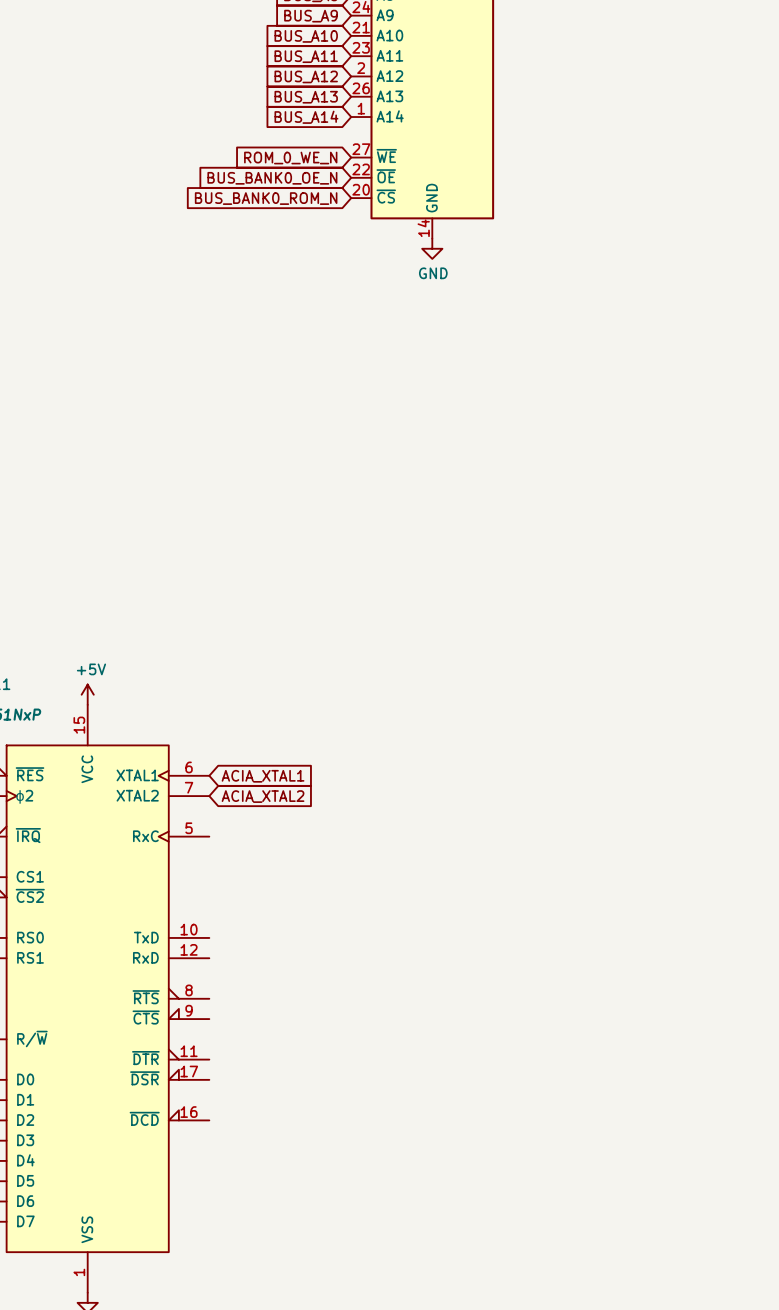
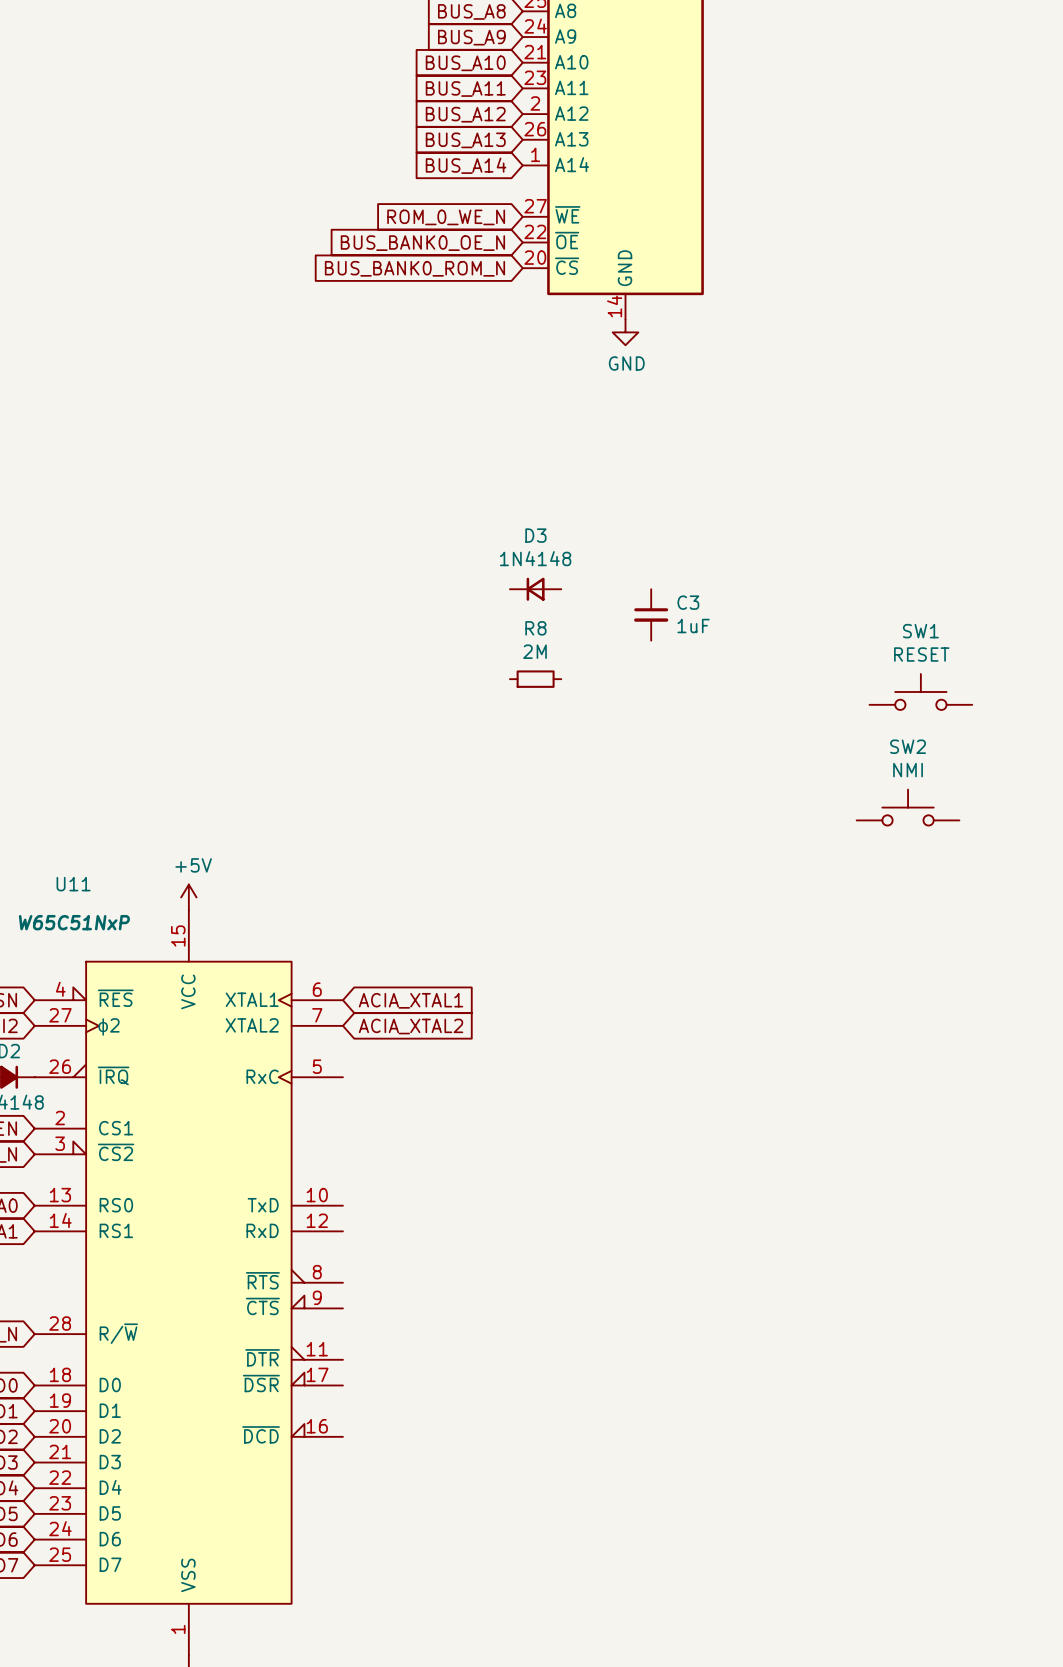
D3: none -> 1N4148 (535, 589)
C3: none -> 1uF (651, 614)
R8: none -> 2M (535, 679)
SW1: none -> RESET (920, 691)
SW2: none -> NMI (908, 807)

